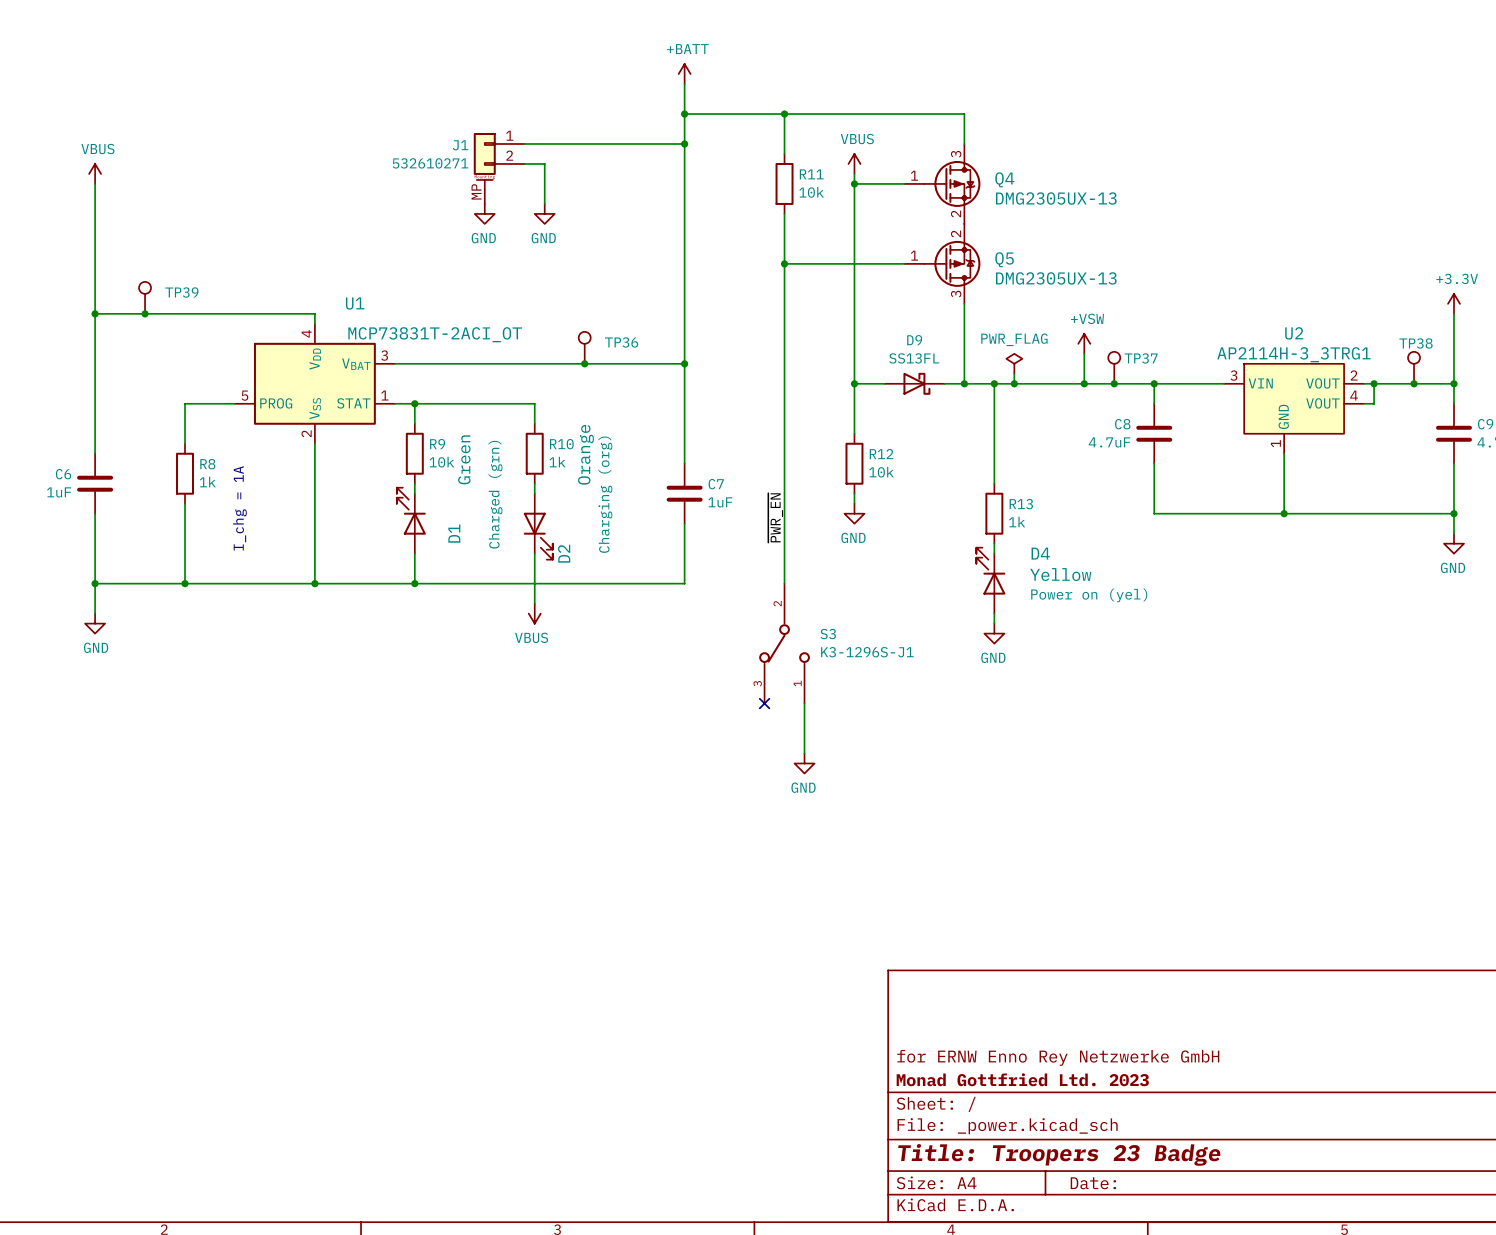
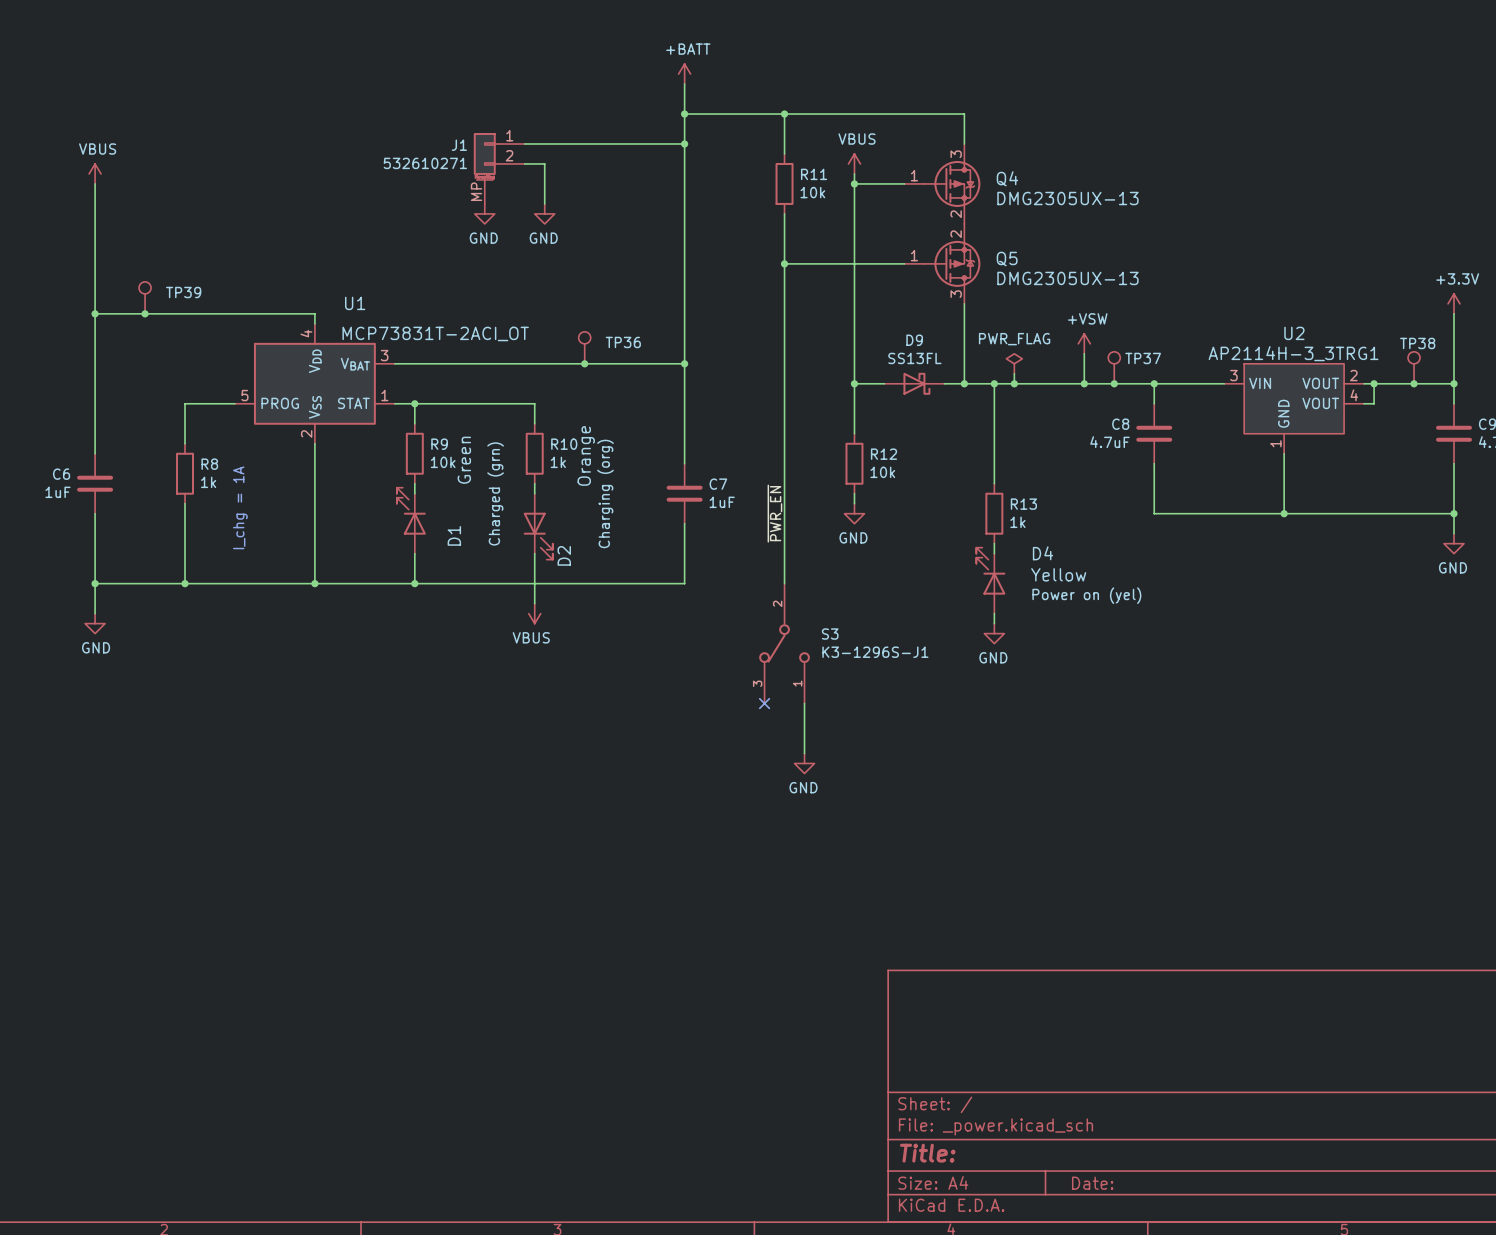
title block: for ERNW Enno Rey Netzwerke GmbH (1058, 1057) -> none
title block: Monad Gottfried Ltd. 2023 (1022, 1079) -> none
title block: Title: Troopers 23 Badge (1059, 1154) -> Title: (927, 1153)

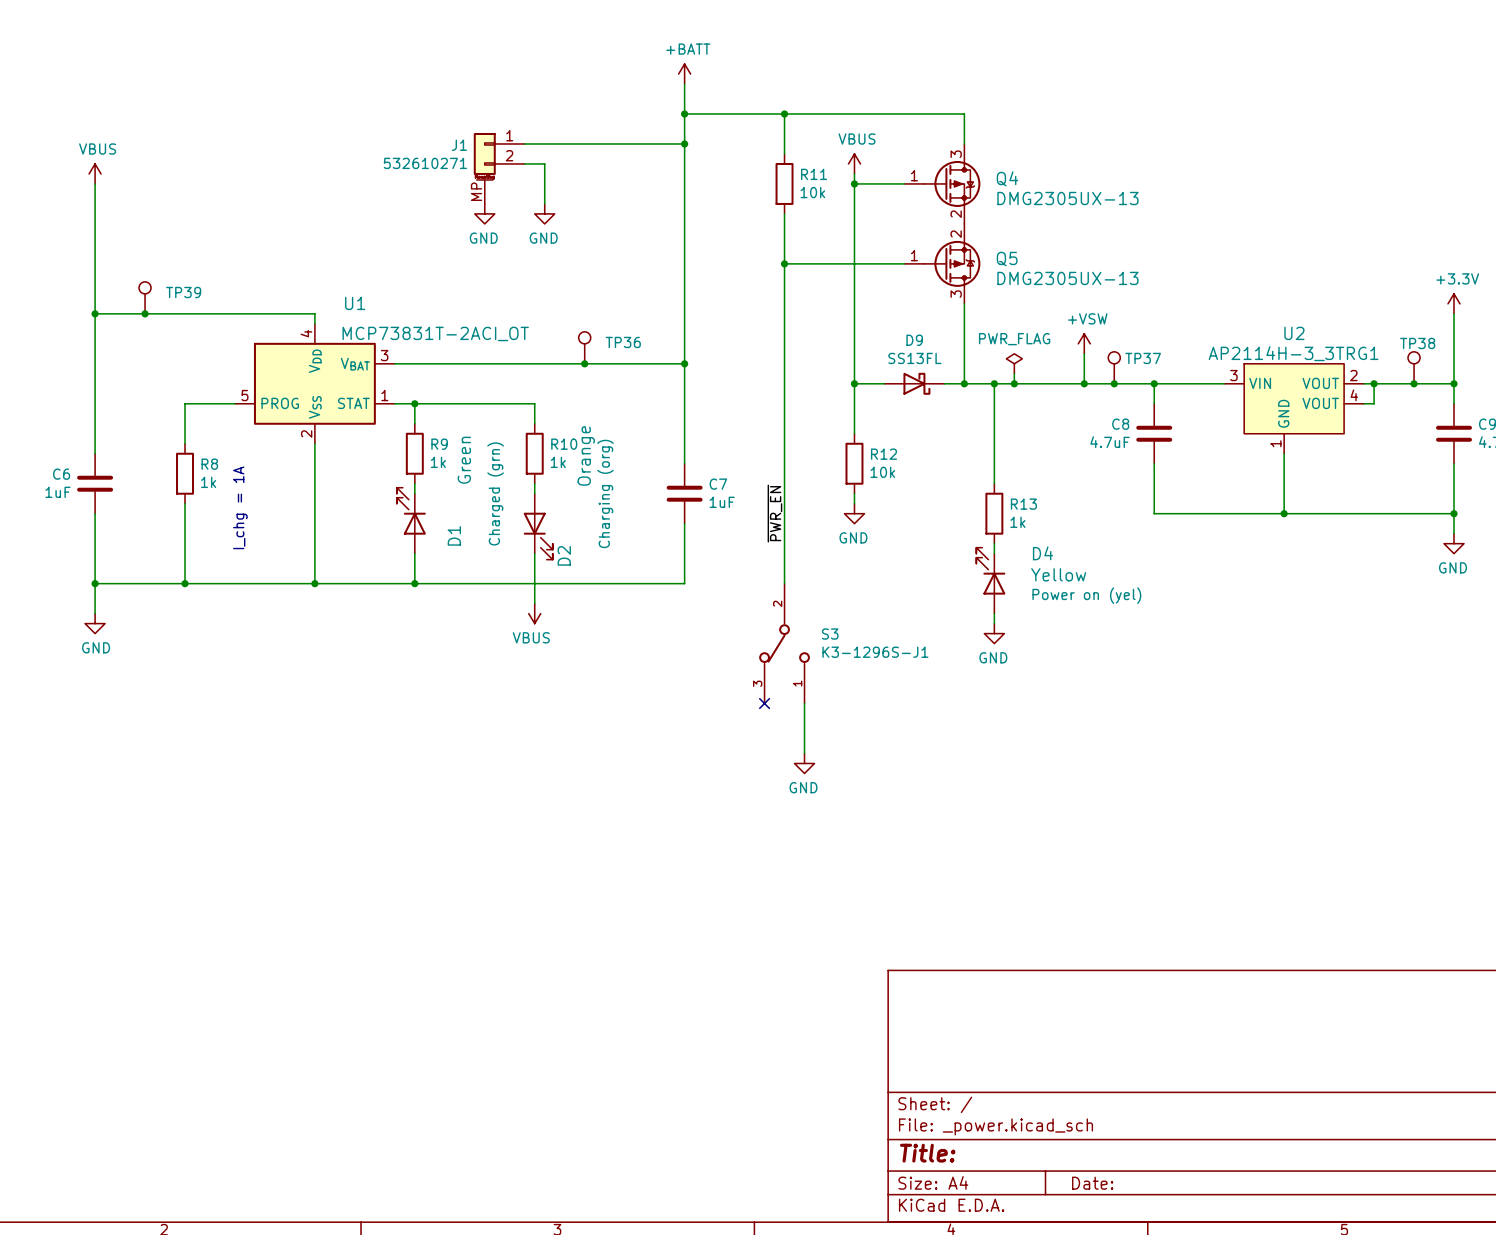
R9 value: 10k (443, 462) -> 1k (438, 462)

